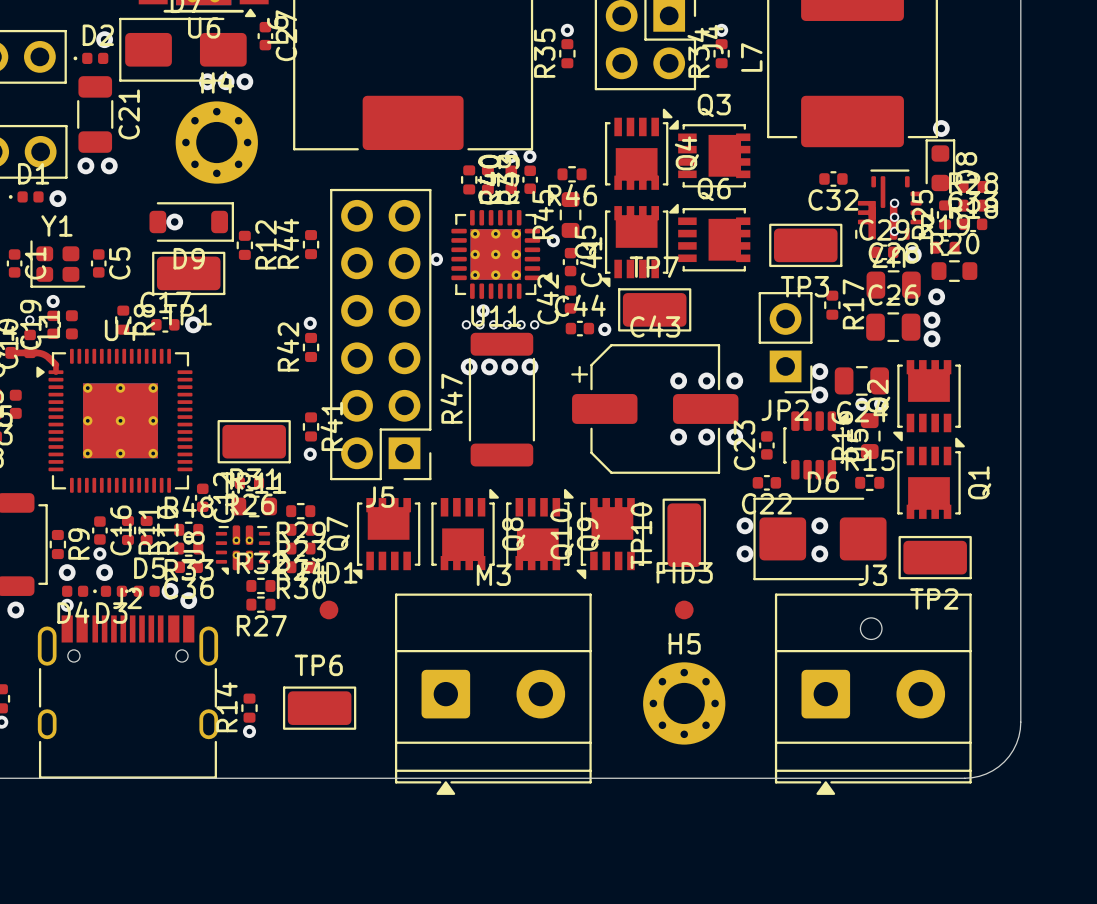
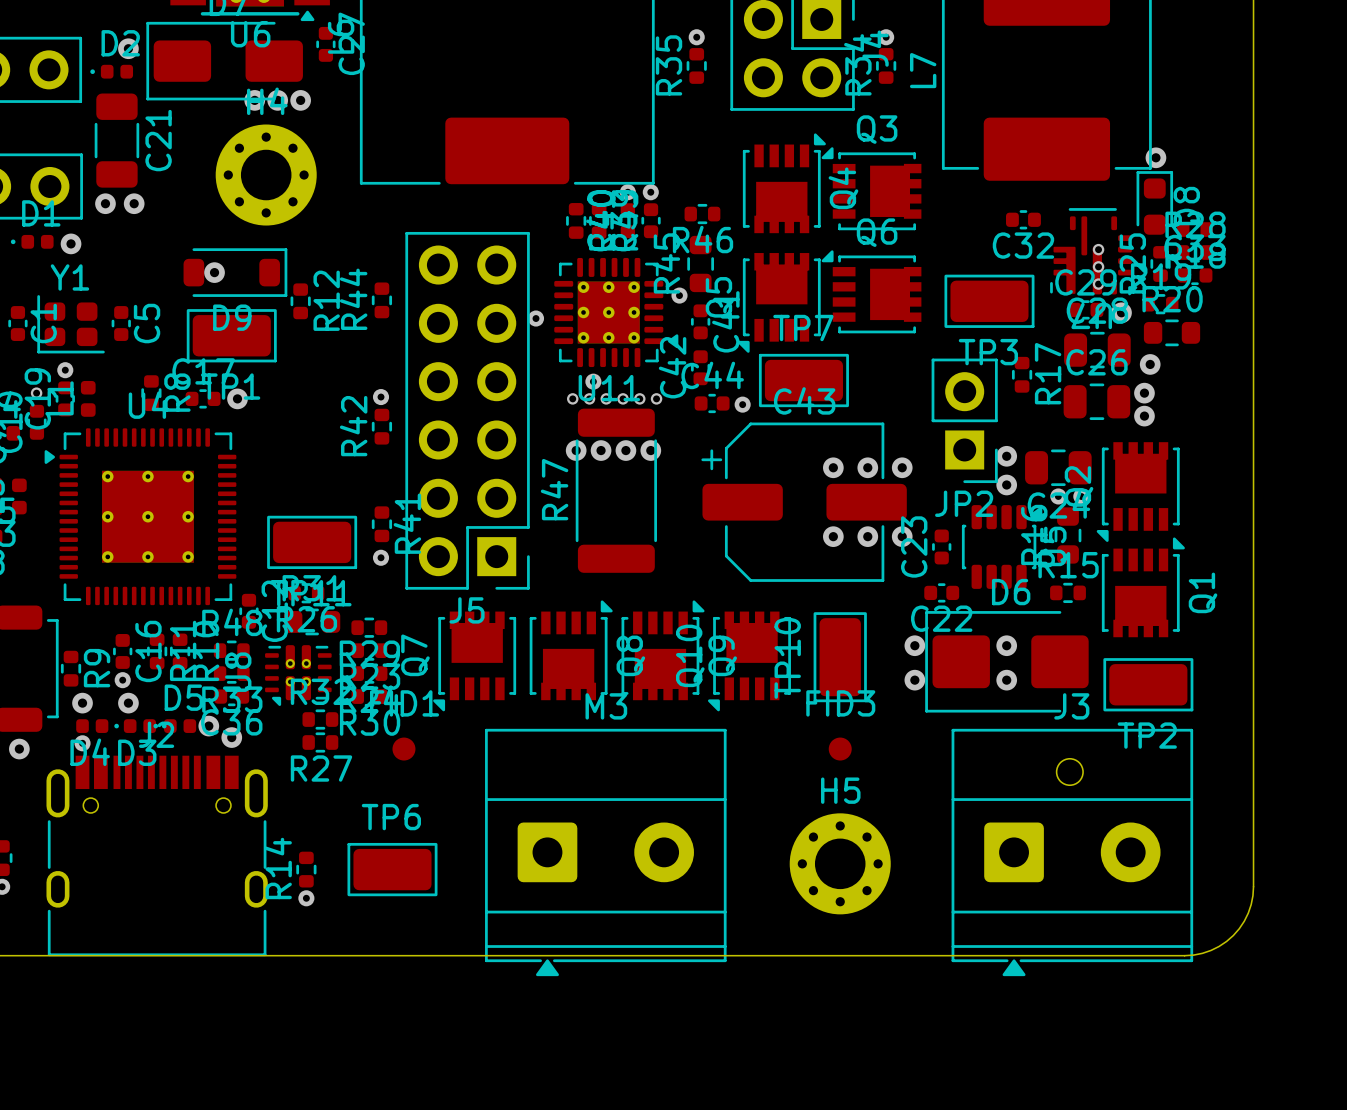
top track: (10, 352) (41, 353) (55, 364) -> none
top track: (55, 366) (55, 372) -> none

